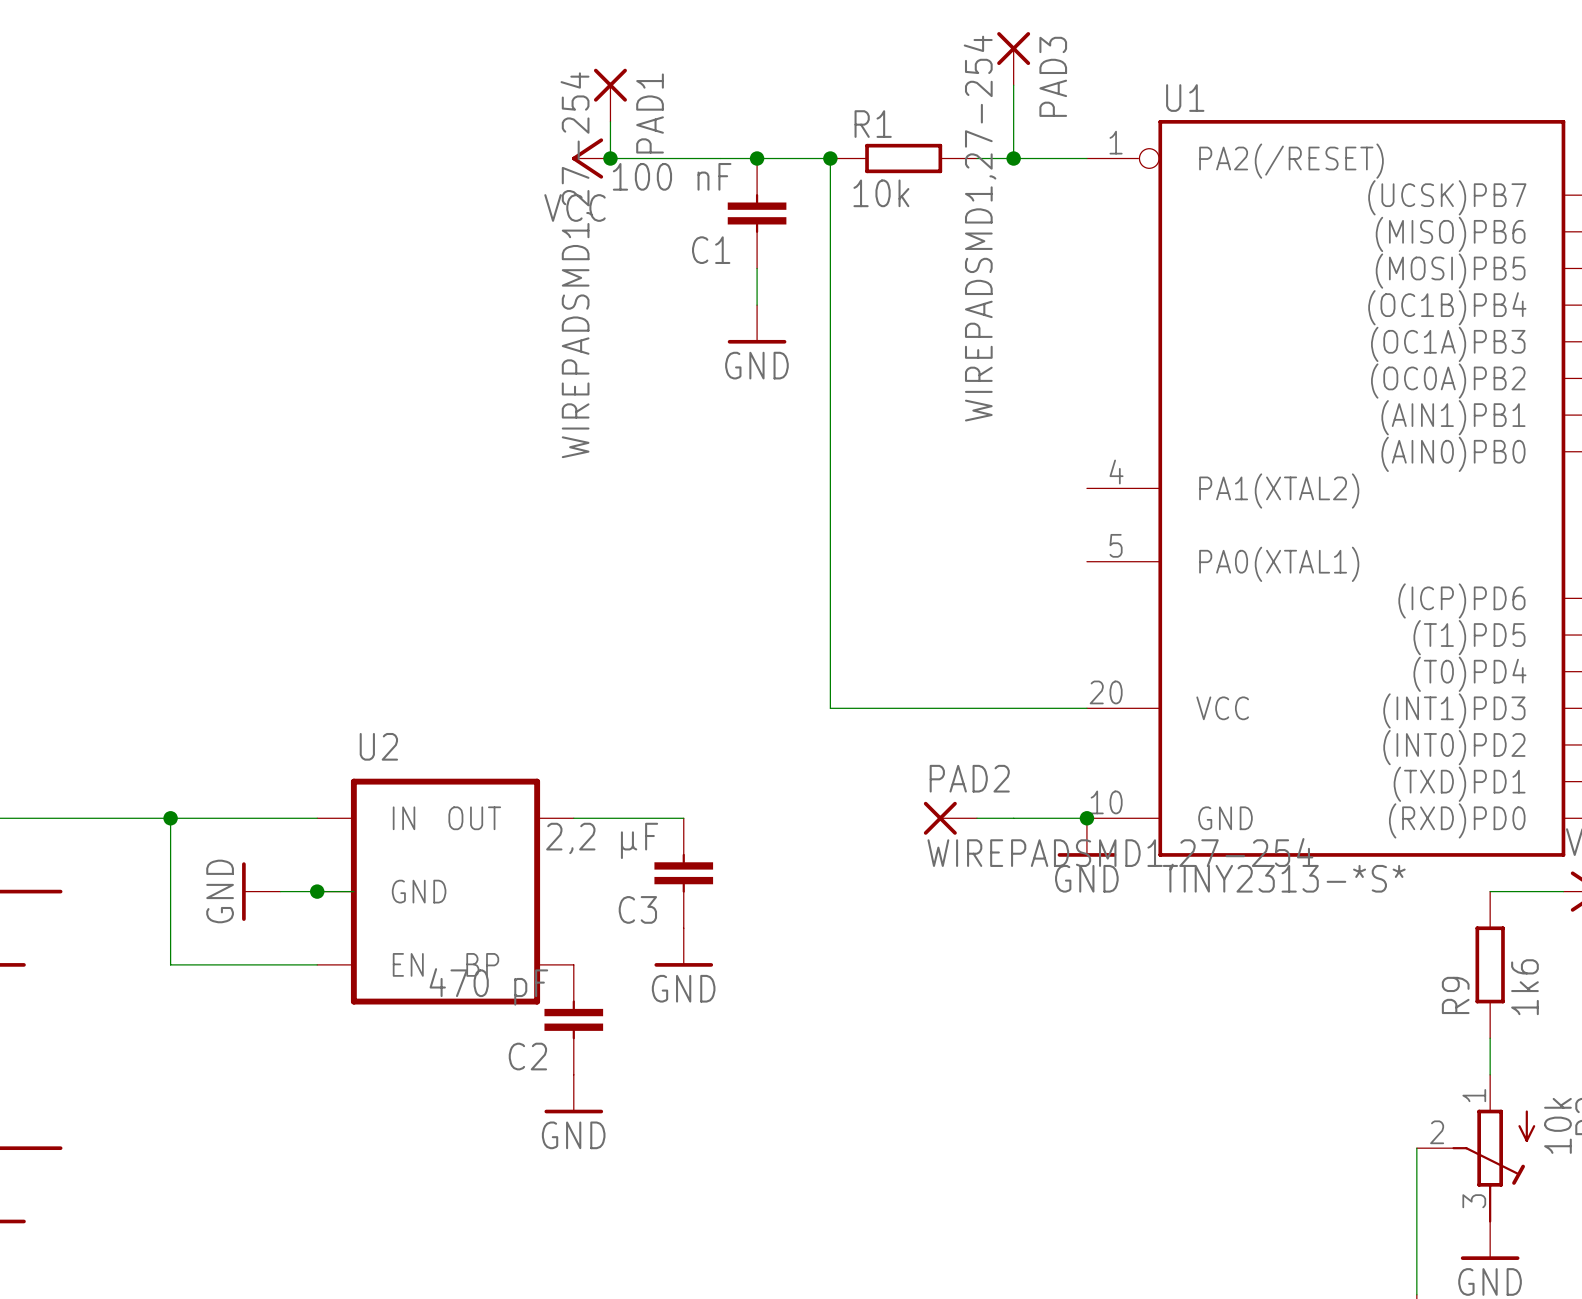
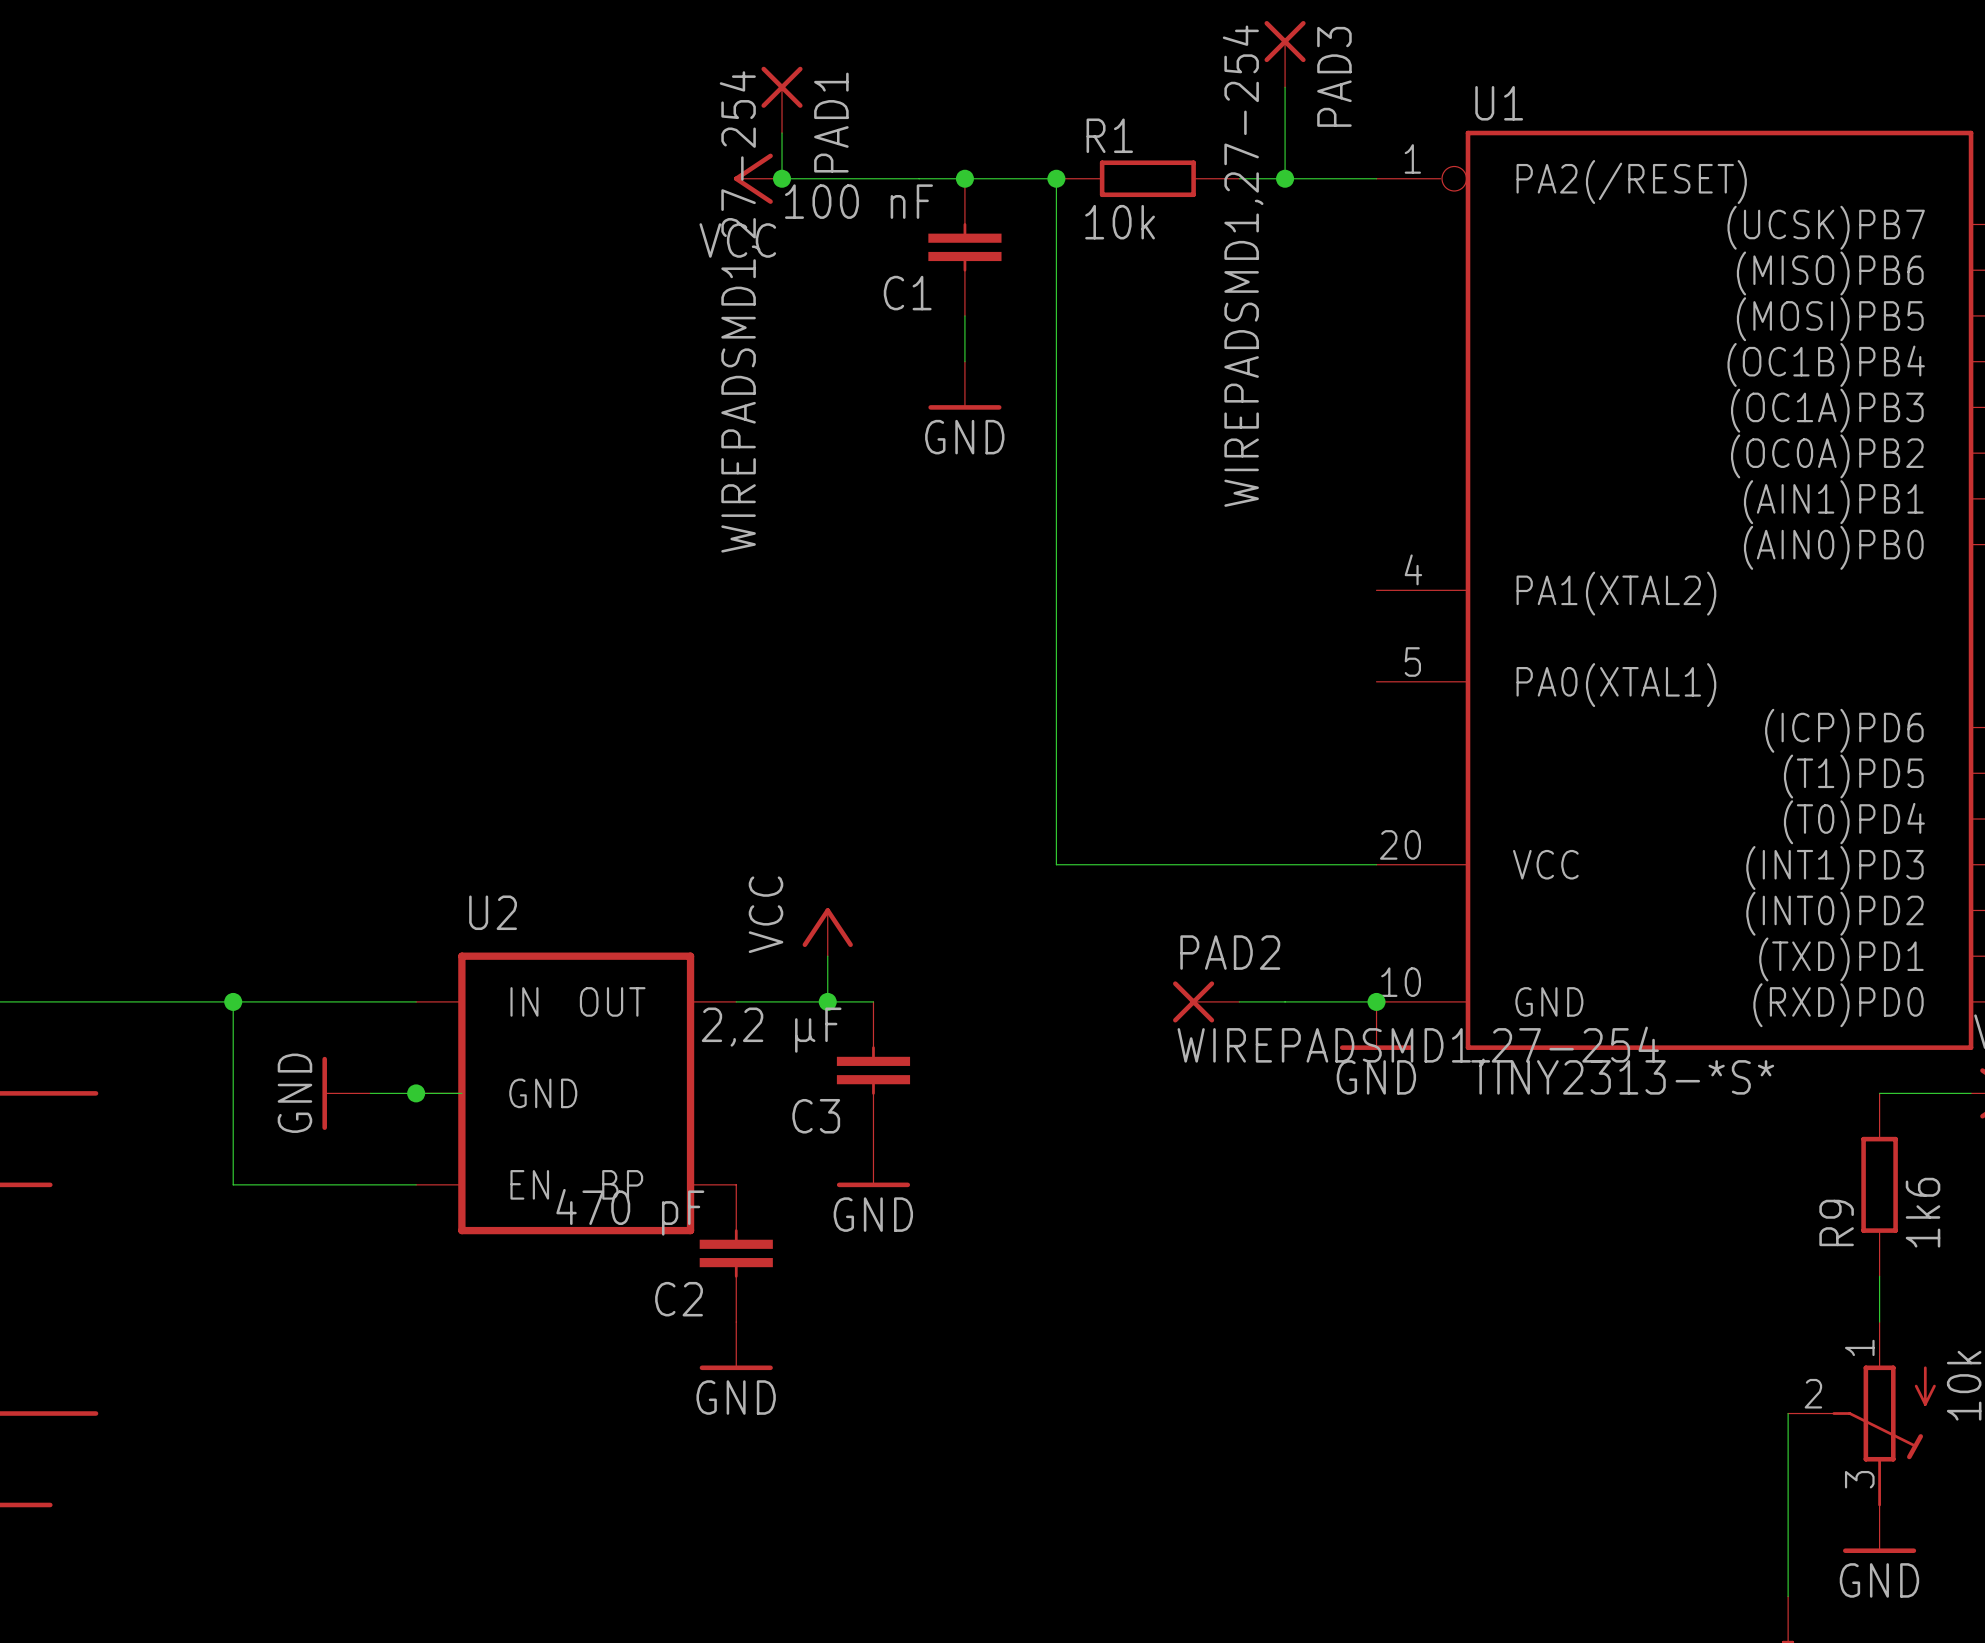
power symbol: none -> VCC (827, 932)
wire: none -> (827, 956) (827, 1001)
junction: none -> (827, 1001)

